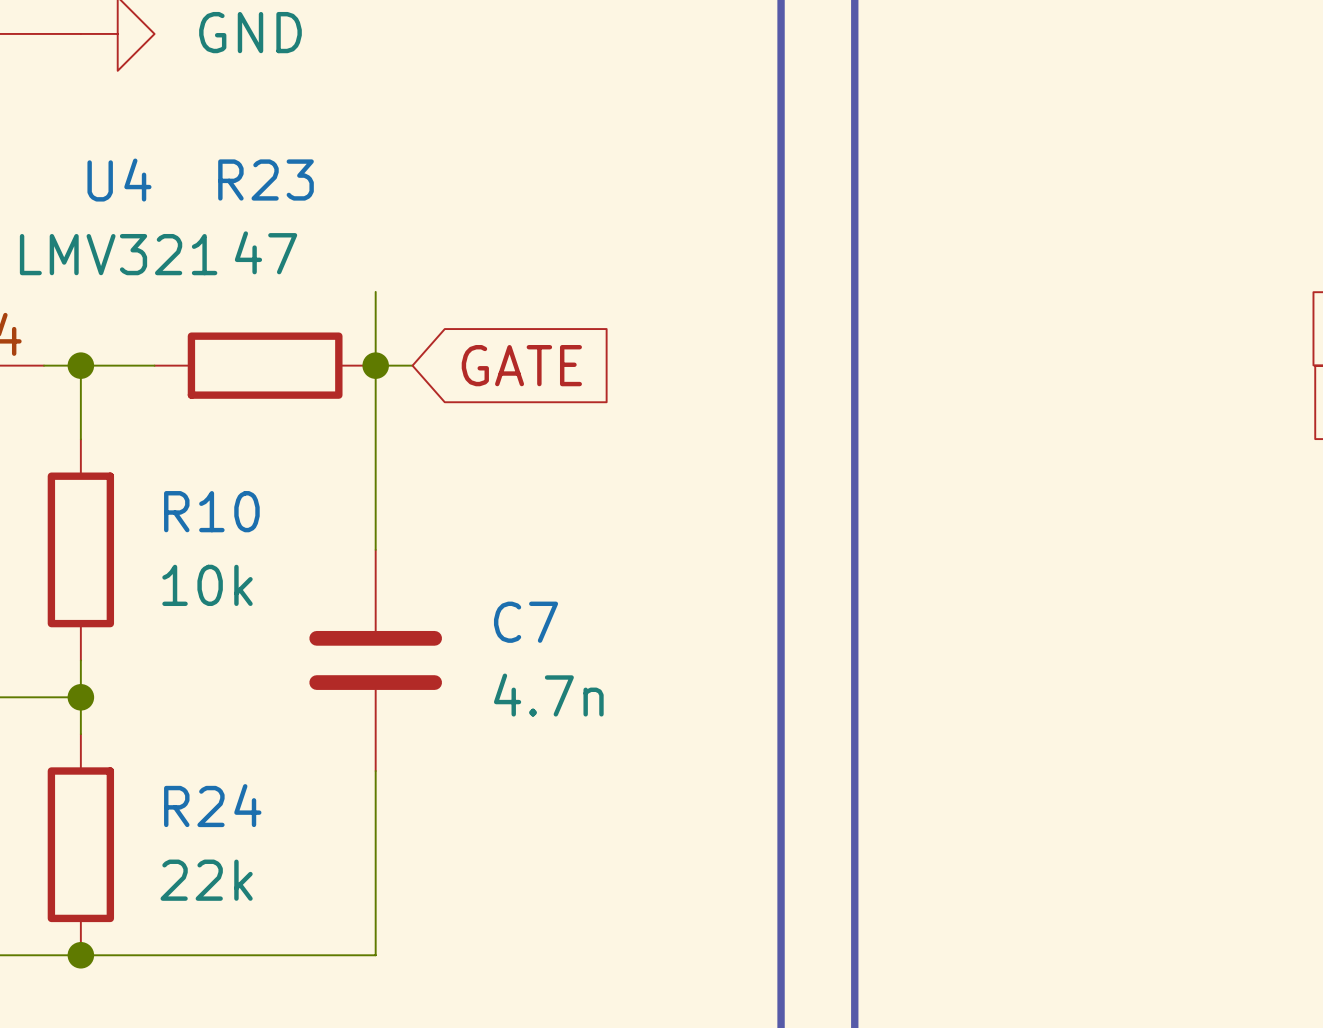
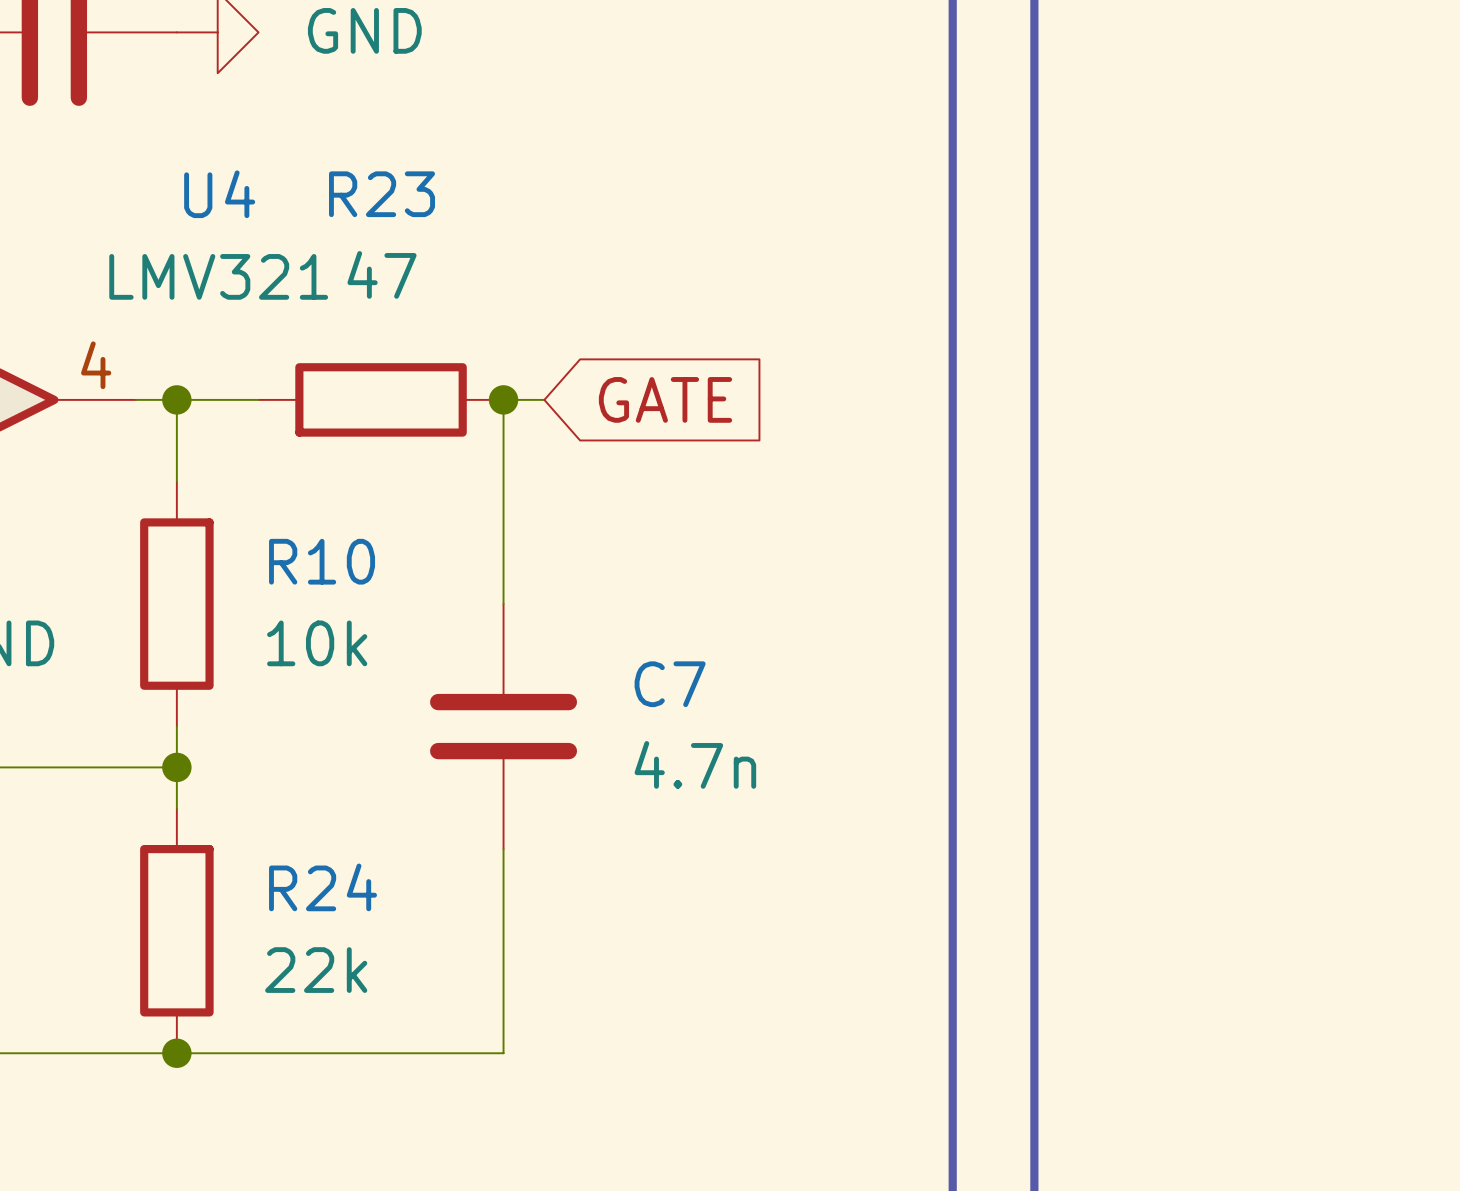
wire: (375, 291) (375, 365) -> none

